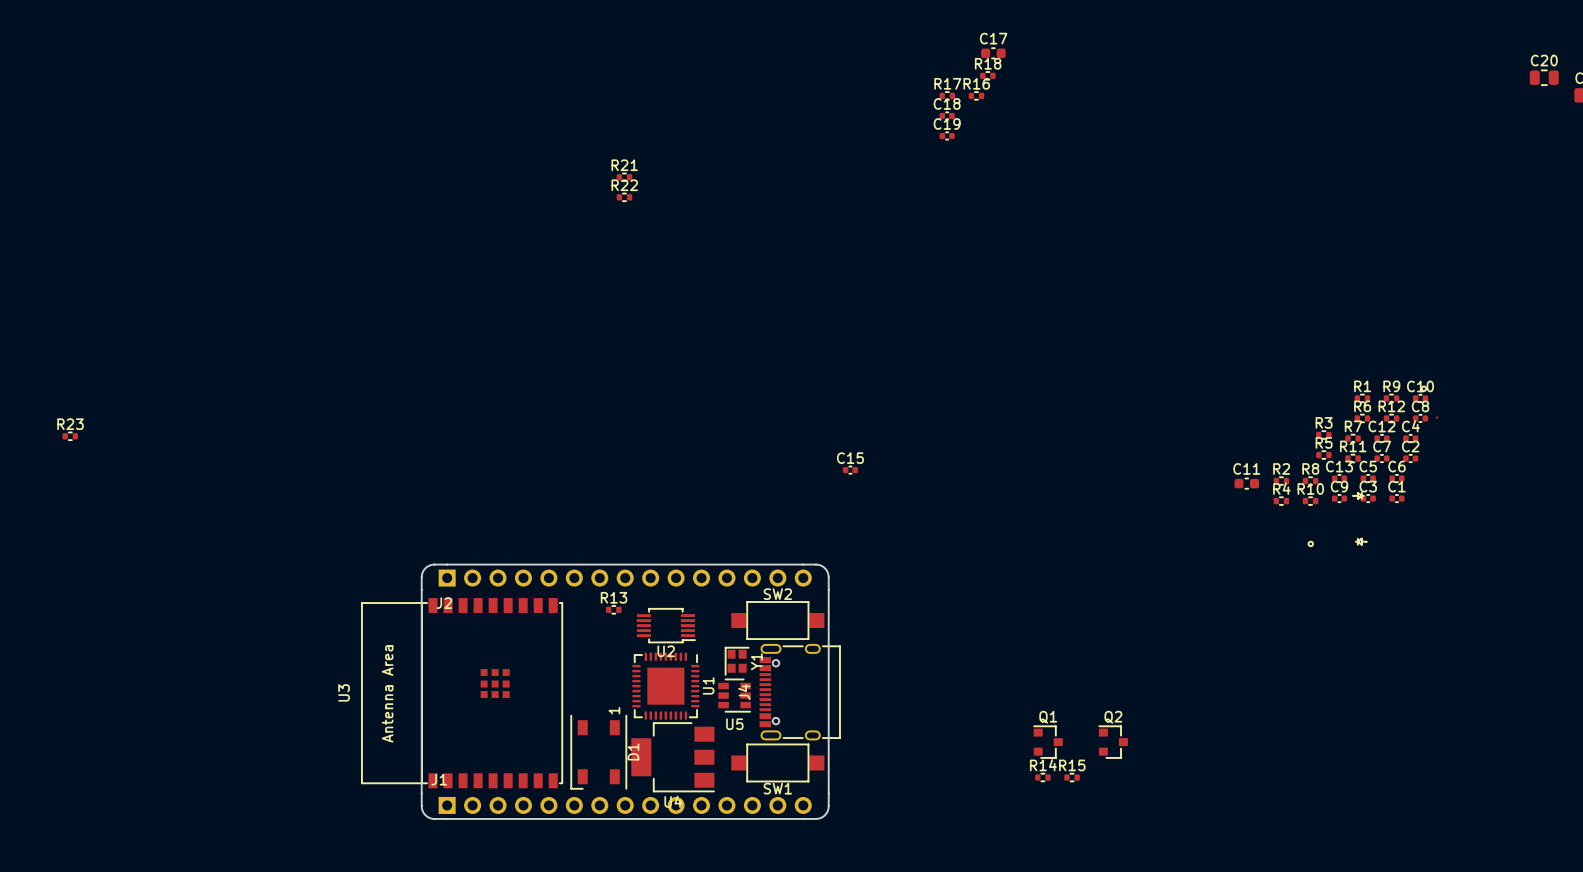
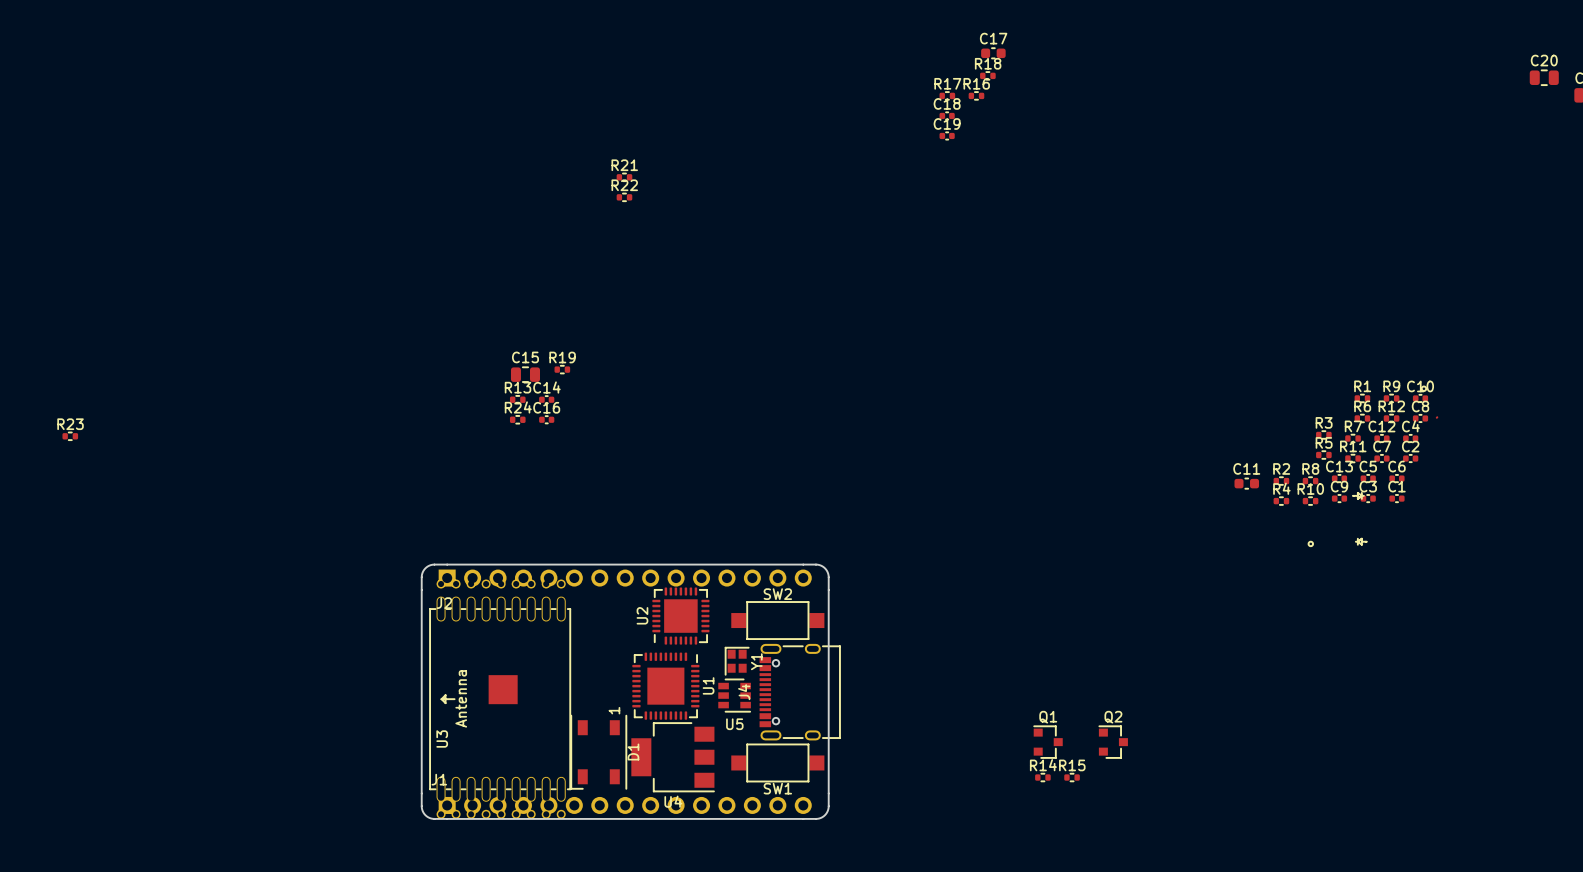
R19: none -> (562, 369)
C14: none -> (546, 399)
R24: none -> (517, 419)
C16: none -> (546, 419)
C15 footprint: [842, 465, 859, 475] -> [510, 366, 541, 383]
U3 footprint: [361, 598, 563, 789] -> [429, 579, 571, 819]
U2 footprint: [636, 608, 696, 644] -> [652, 587, 710, 645]
R13 position: (613, 609) -> (517, 399)
U2 name position: U2 (666, 651) -> U2 (642, 615)
U3 name position: U3 (344, 692) -> U3 (442, 738)

